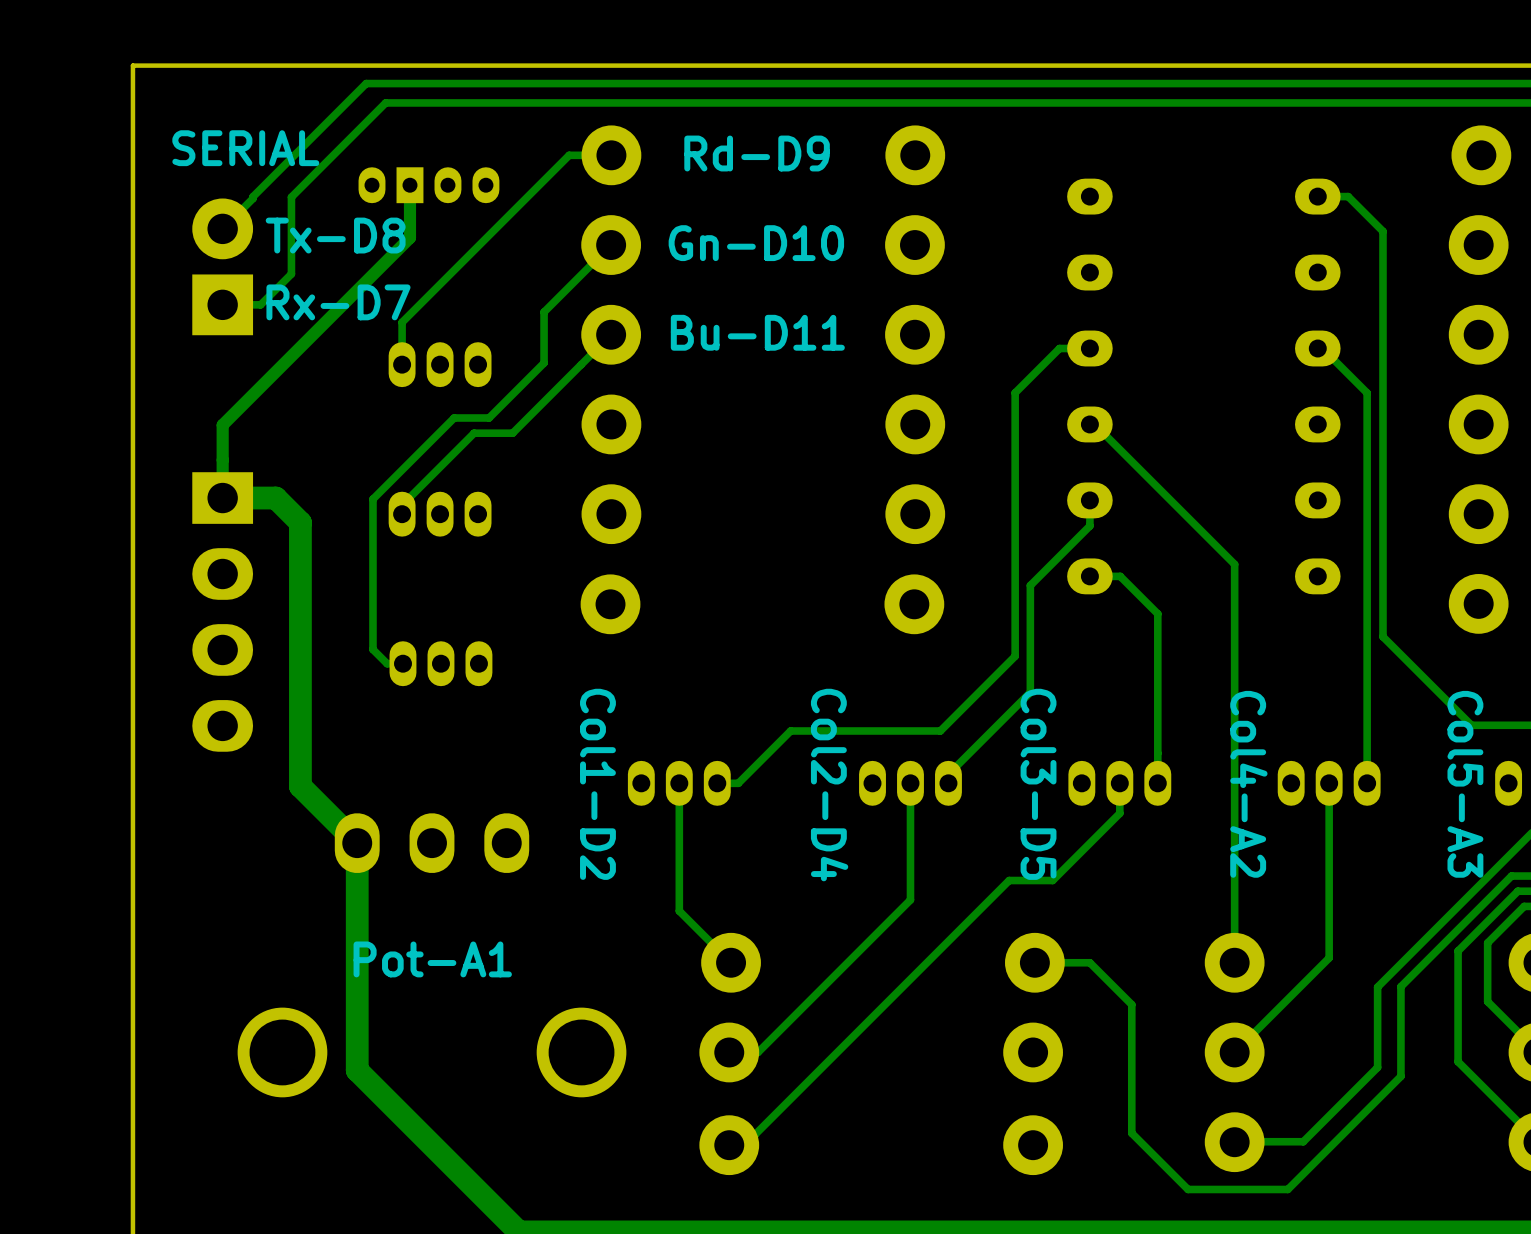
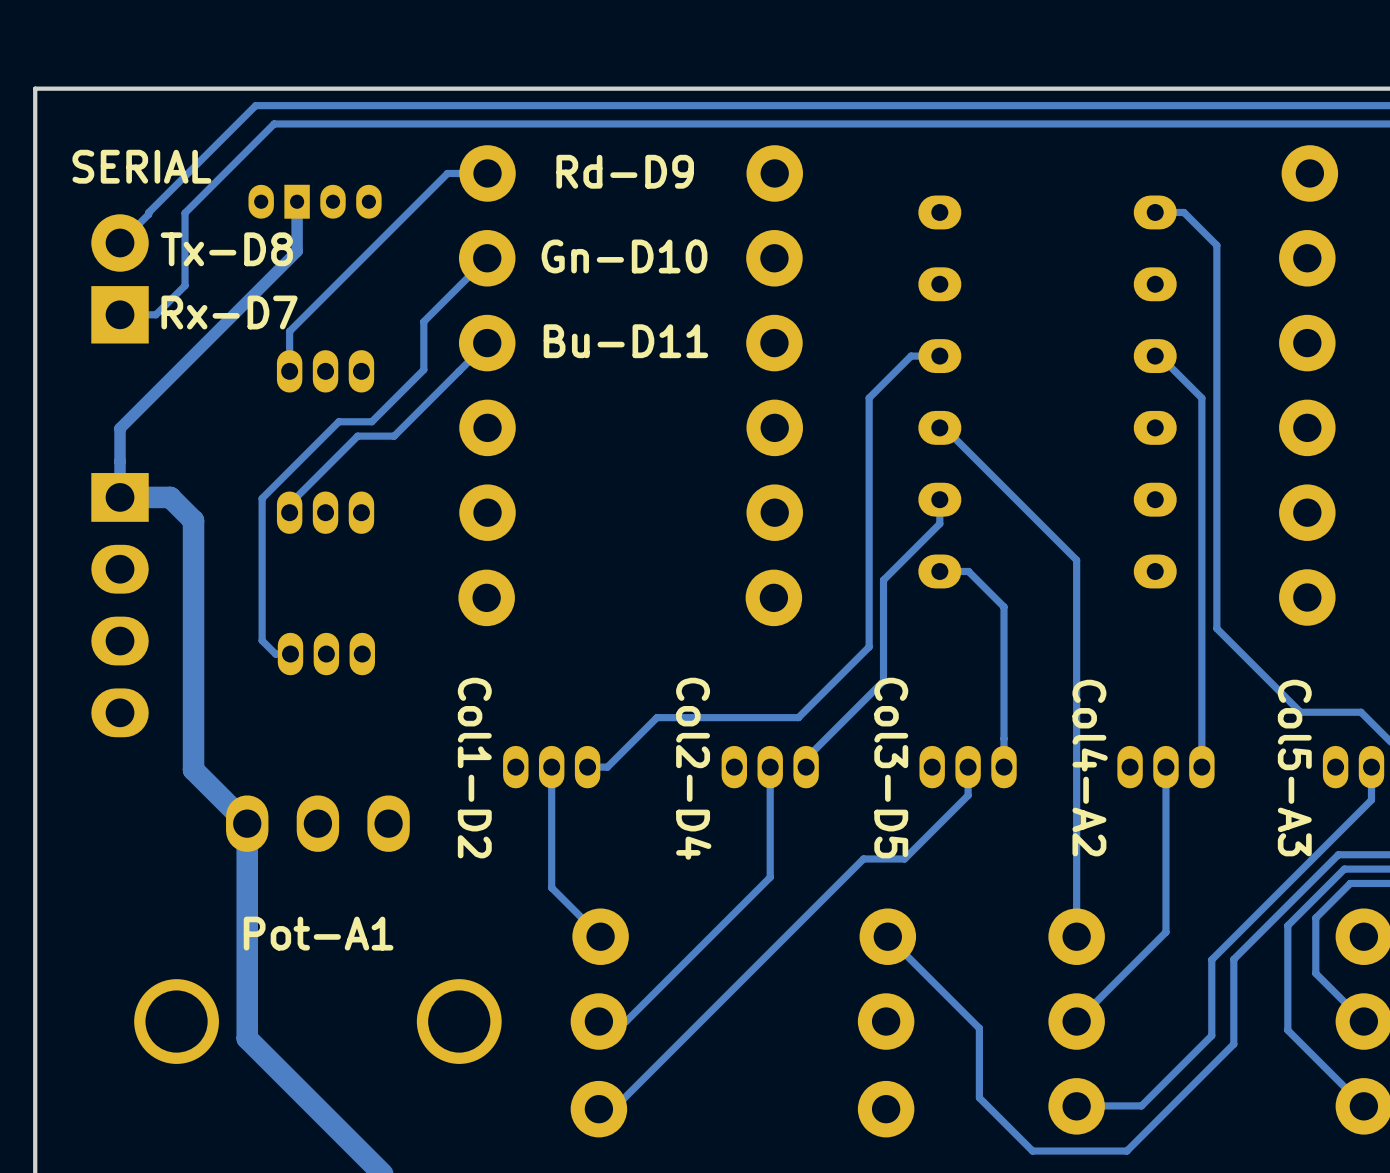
track: (1034, 962) (1089, 962) (1131, 1004) (1131, 1059) -> (887, 936) (979, 1028)

